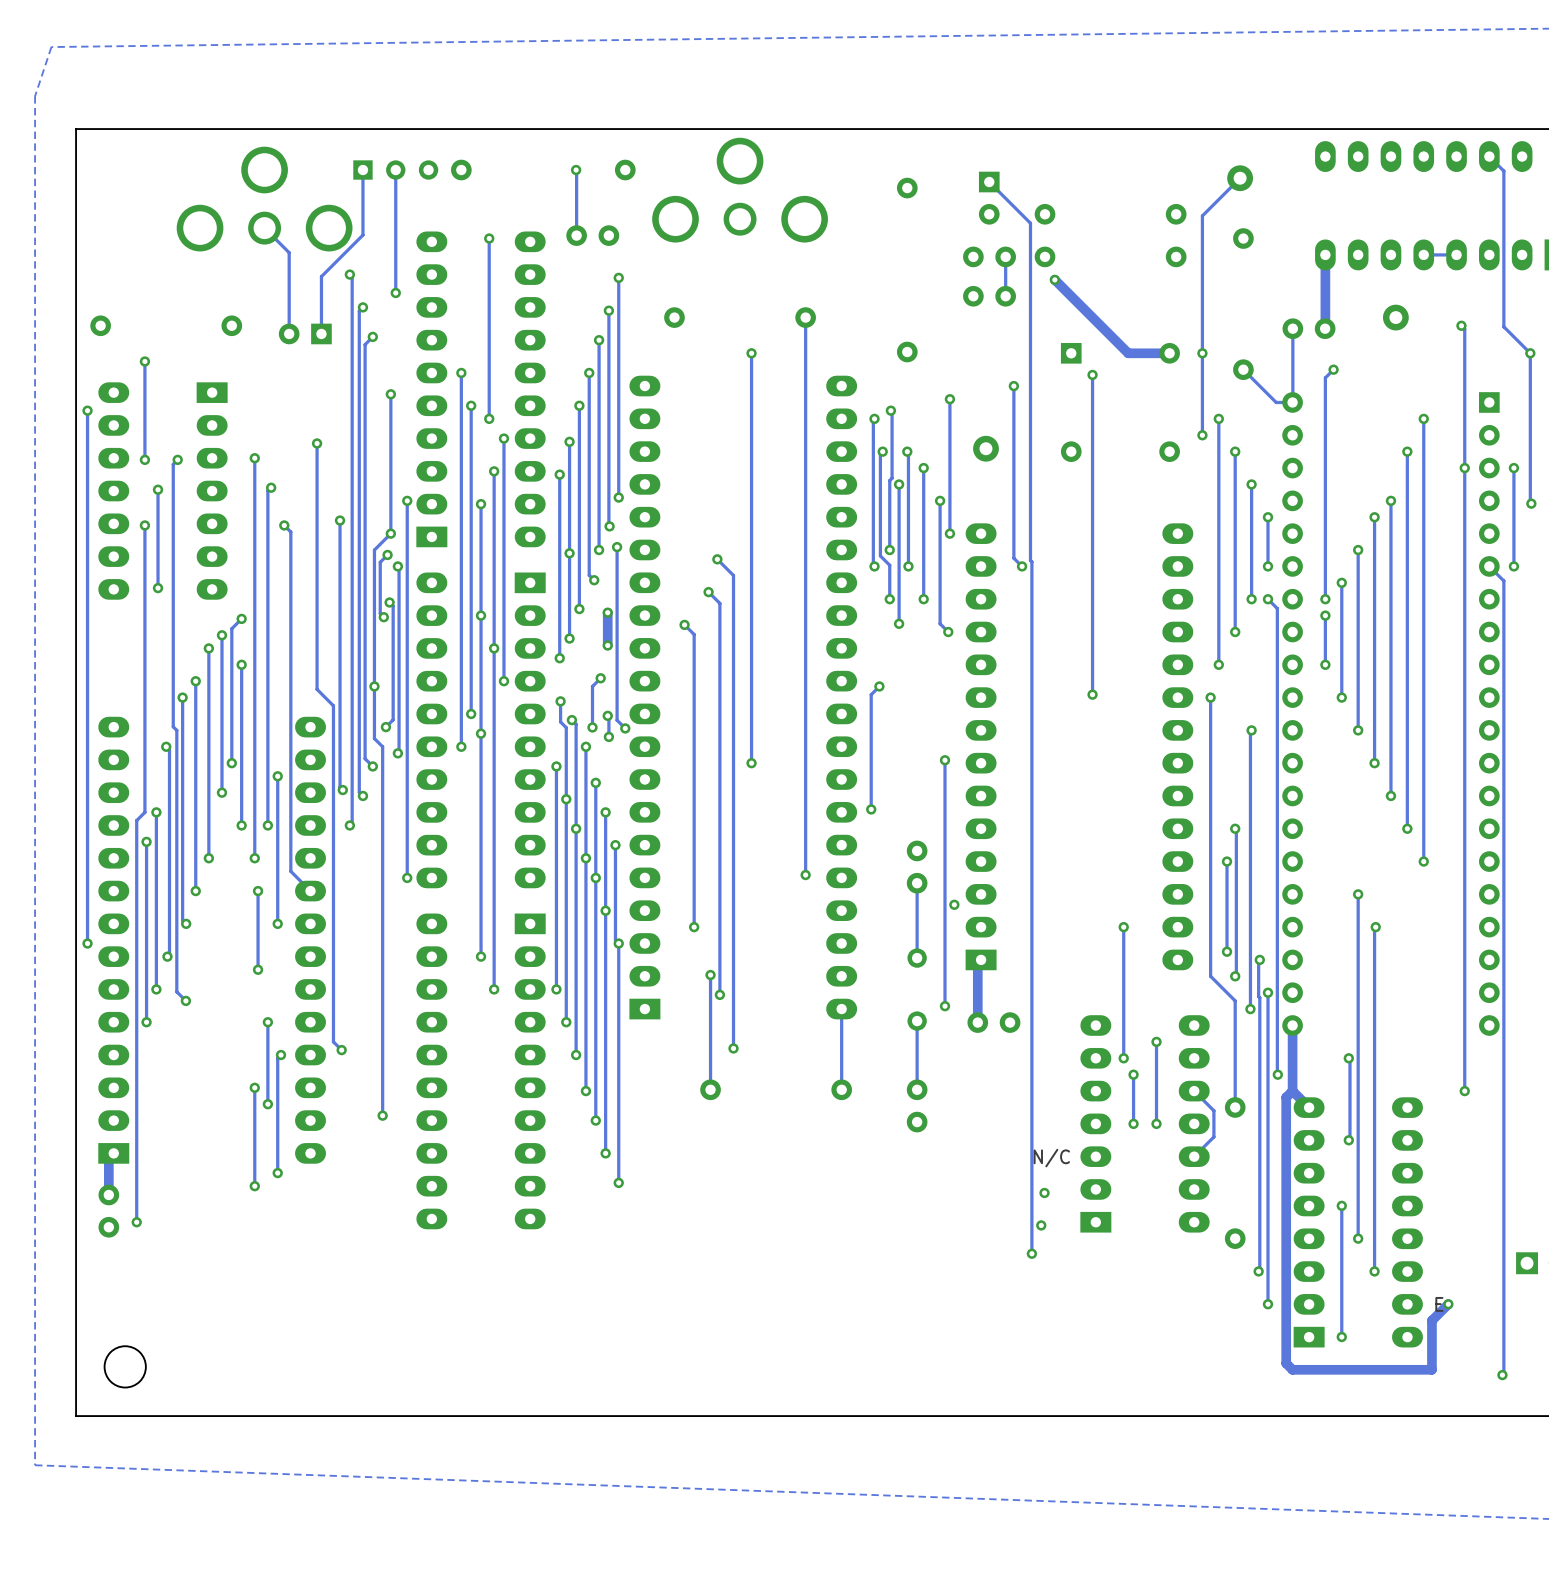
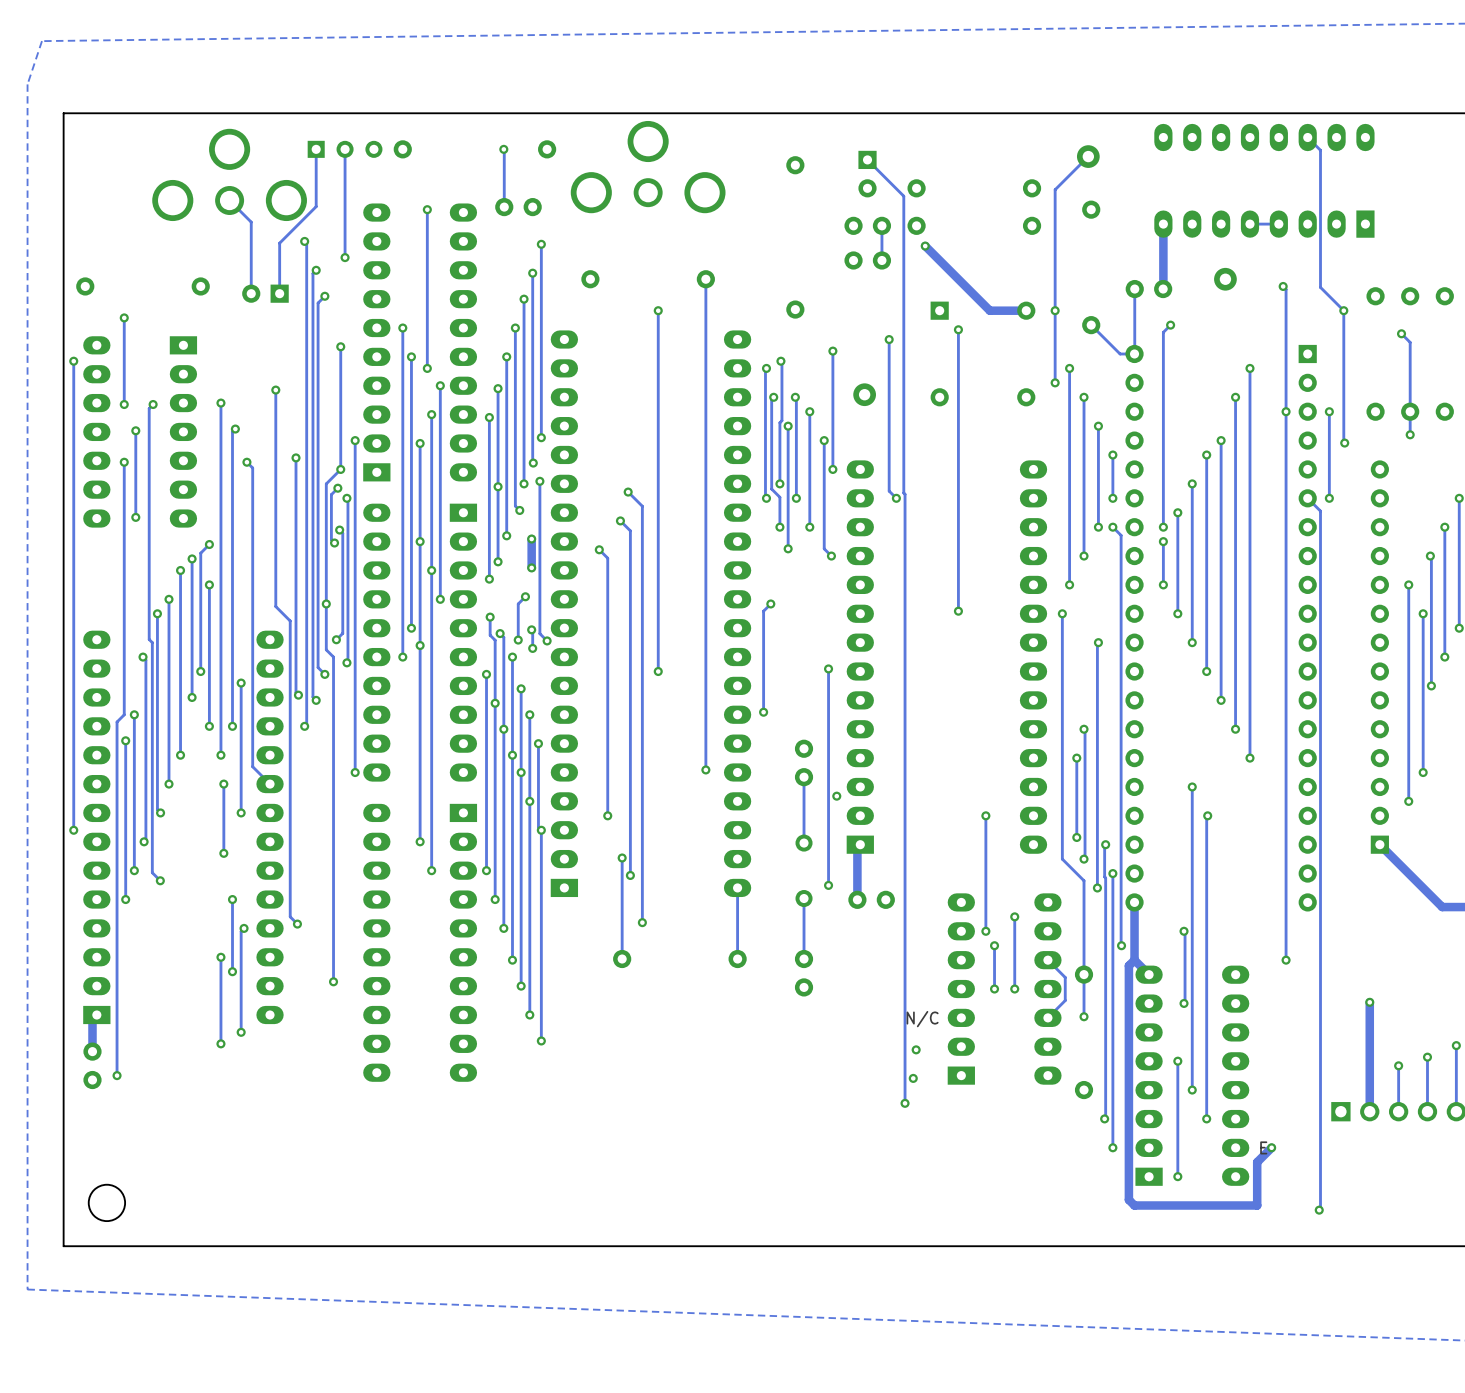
track: none -> (1084, 974) (1084, 1016)
via: none -> (1084, 1016)

